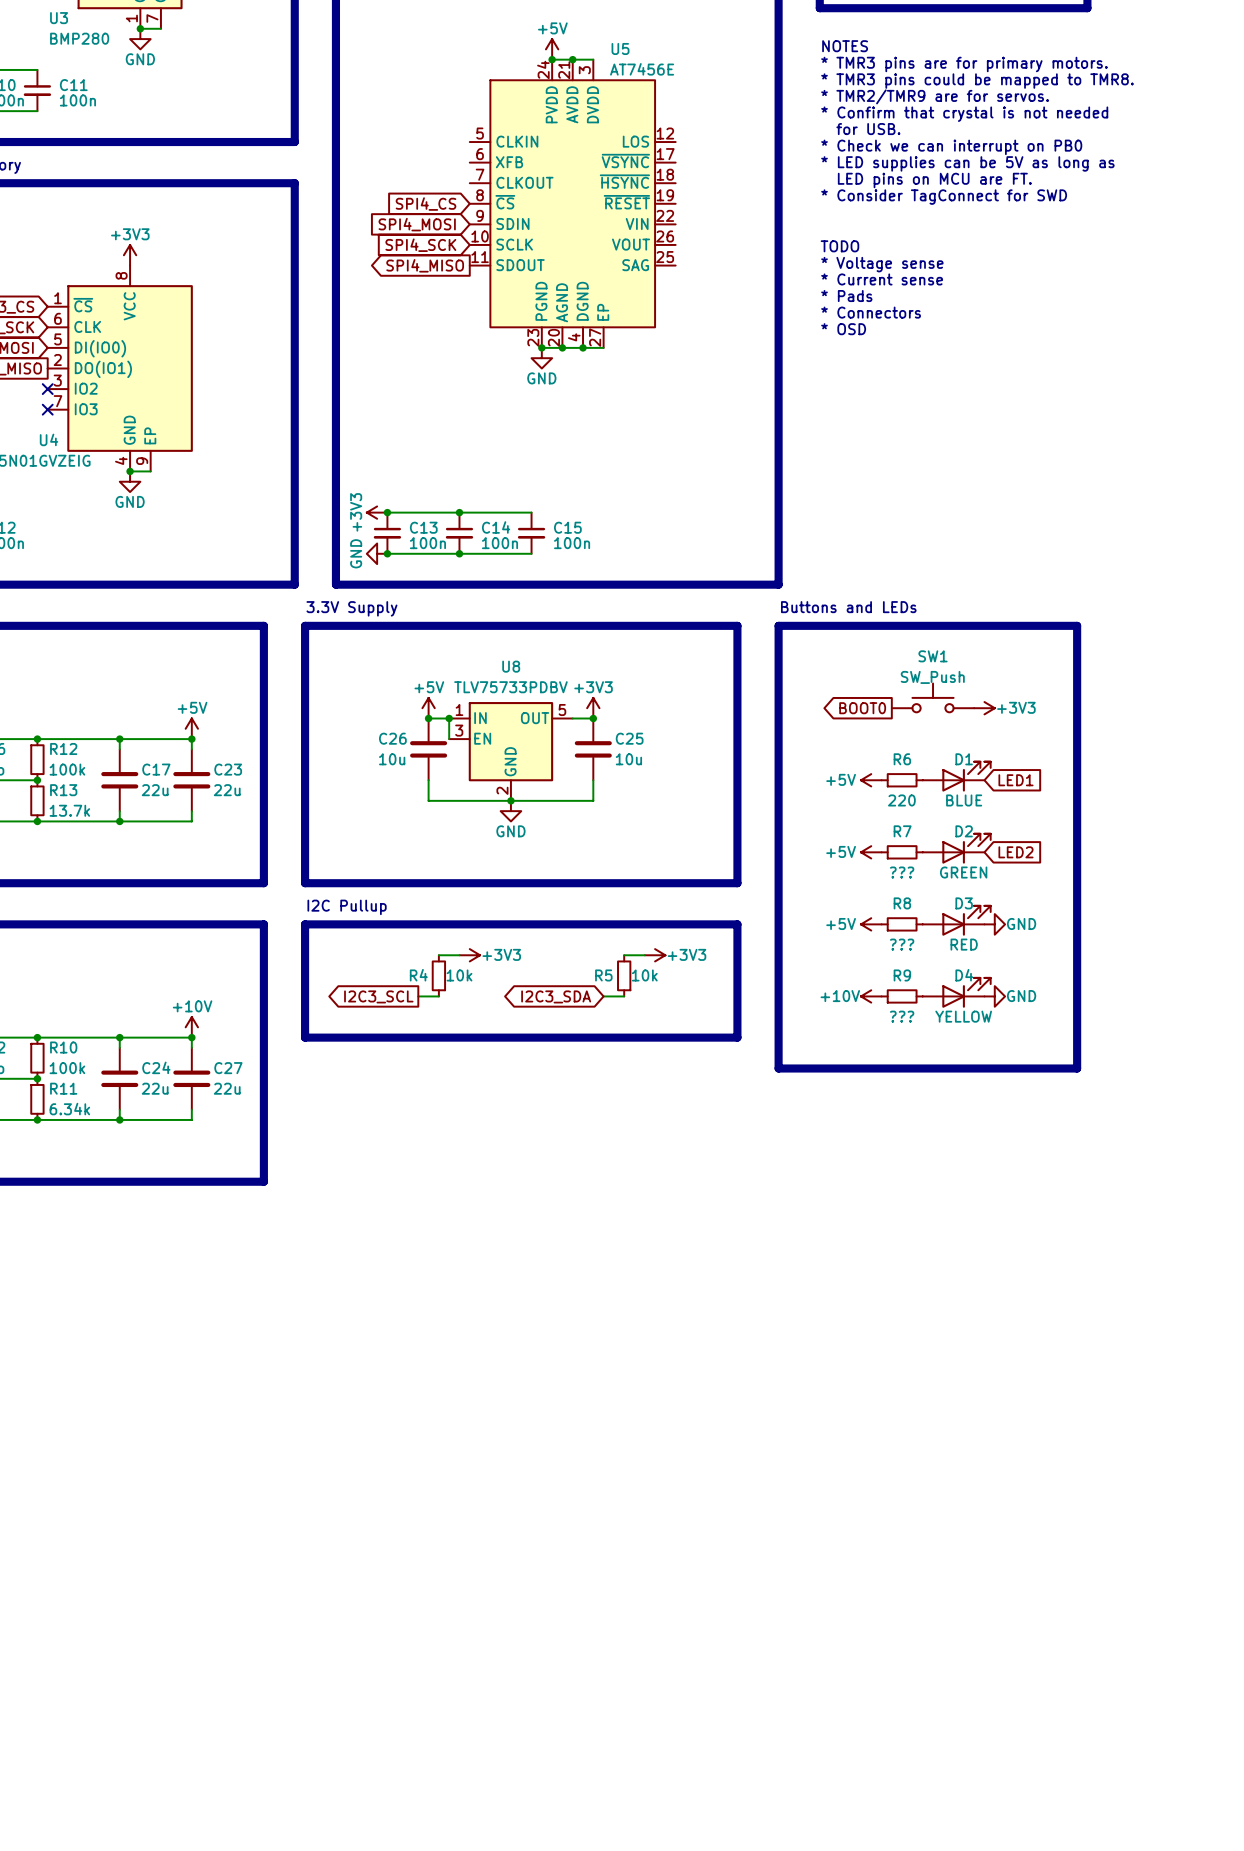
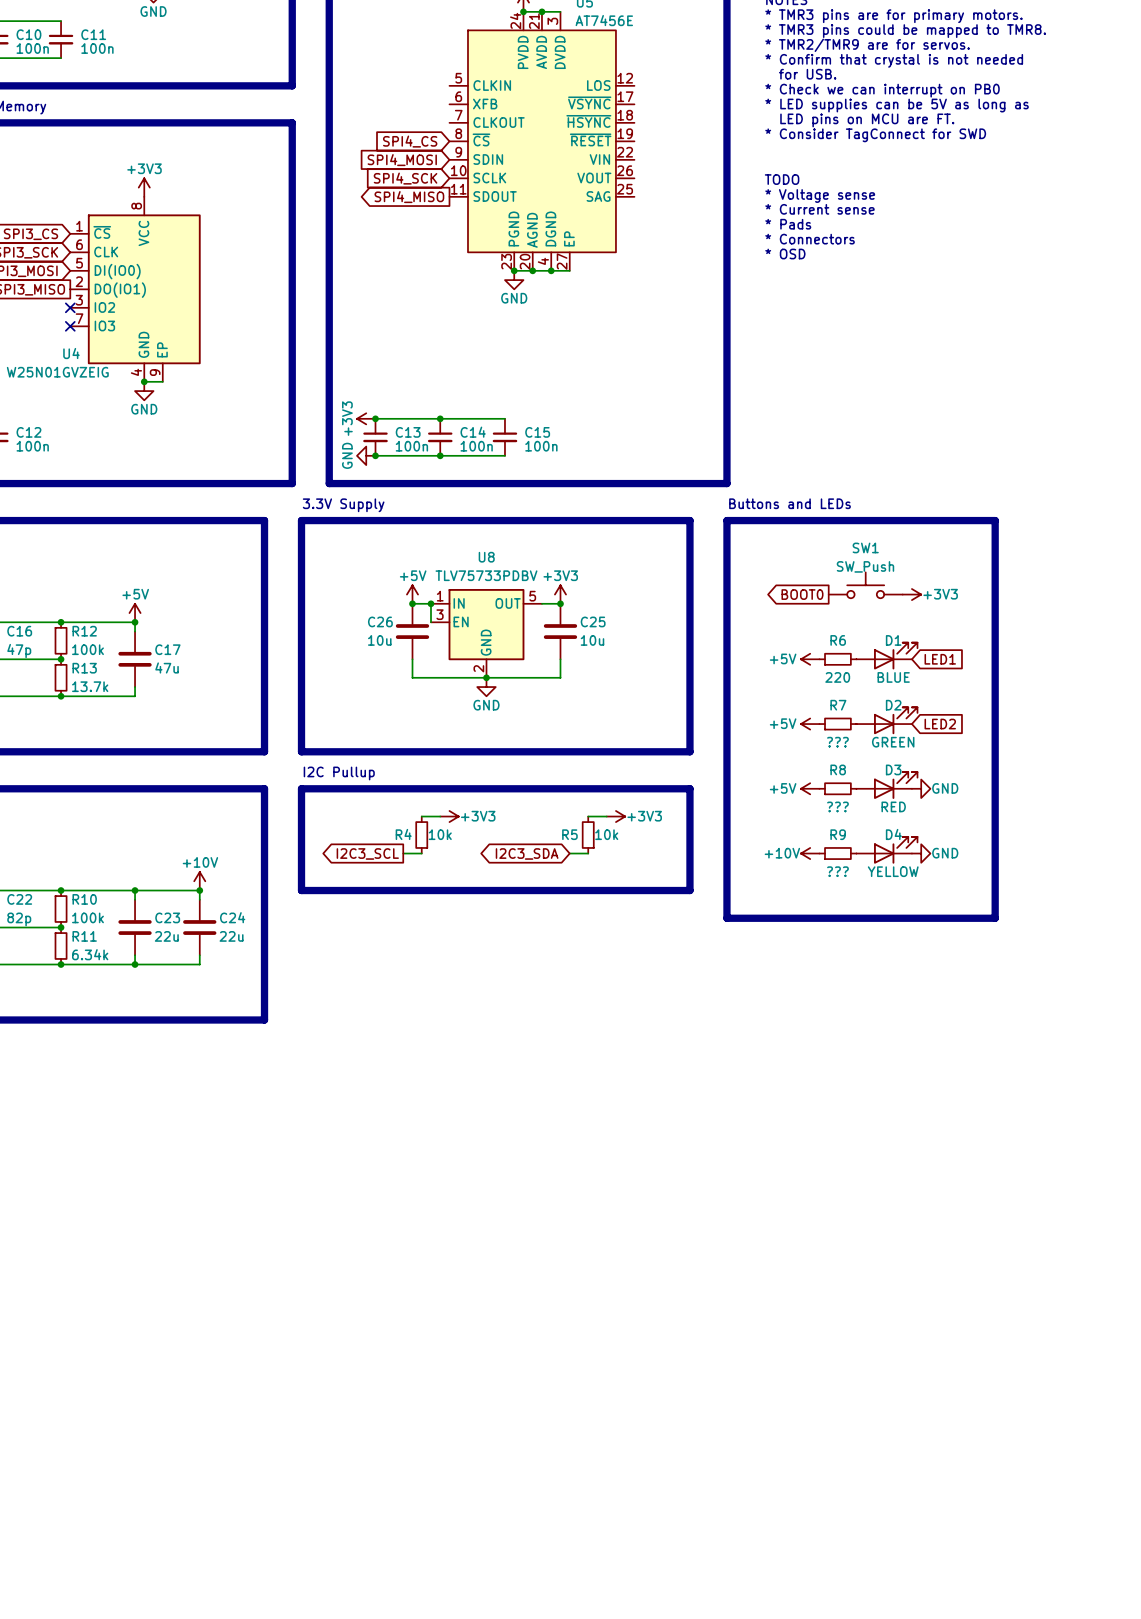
power symbol position: +5V (191, 728) -> +5V (135, 613)
wire: (119, 739) (191, 739) (191, 749) -> none
junction: (191, 739) -> none
C23: 22u (191, 780) -> none
C17 value: 22u (155, 790) -> 47u (167, 667)
wire: (191, 811) (191, 821) (119, 821) -> none
junction: (119, 821) -> none
C24 name: C24 (156, 1067) -> C23 (167, 917)
C27 name: C27 (228, 1068) -> C24 (232, 917)

